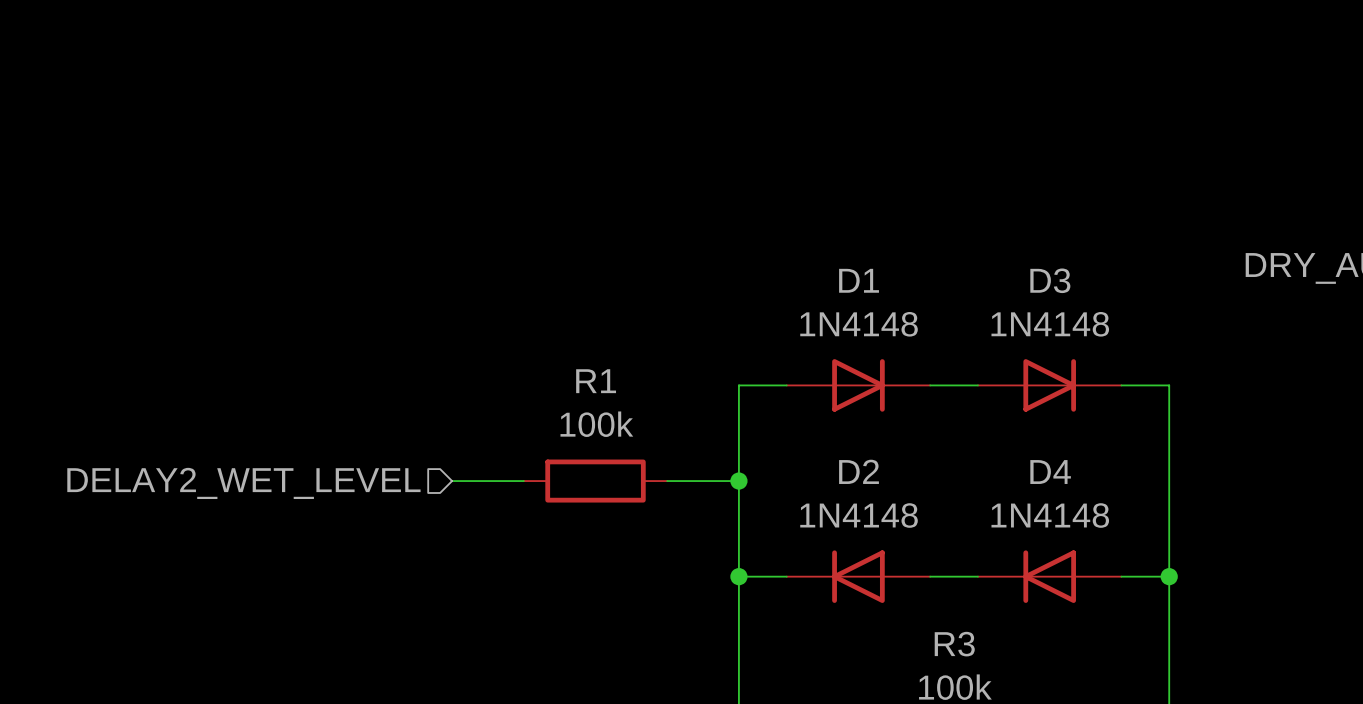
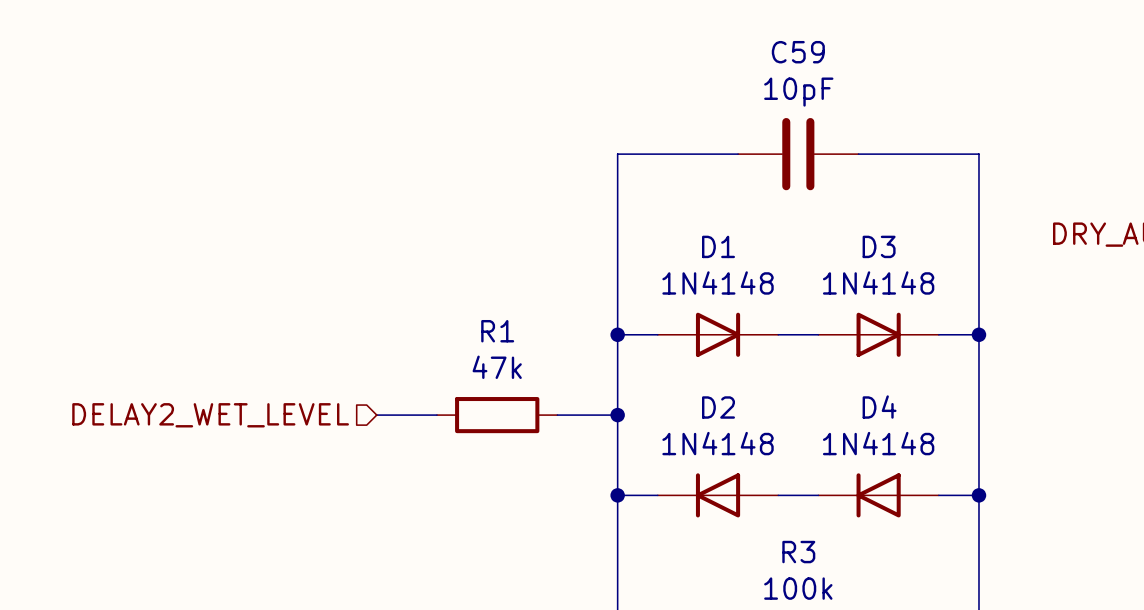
wire: none -> (738, 154) (617, 154) (617, 334)
C59: none -> 10pF (798, 154)
wire: none -> (858, 154) (978, 154) (978, 334)
junction: none -> (617, 334)
junction: none -> (978, 334)
R1 value: 100k (596, 424) -> 47k (497, 367)

